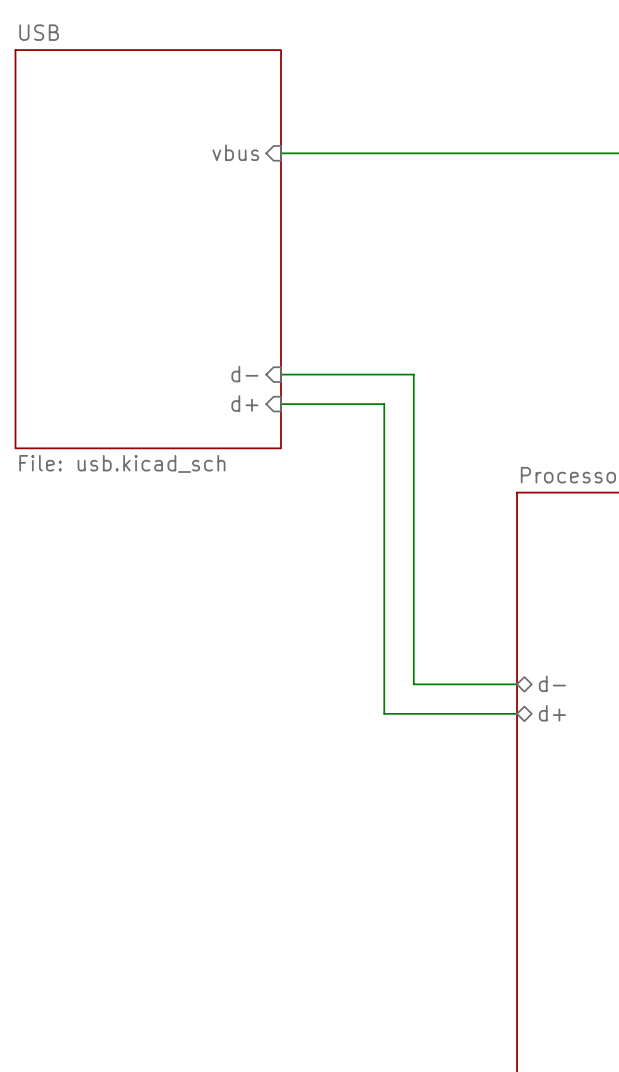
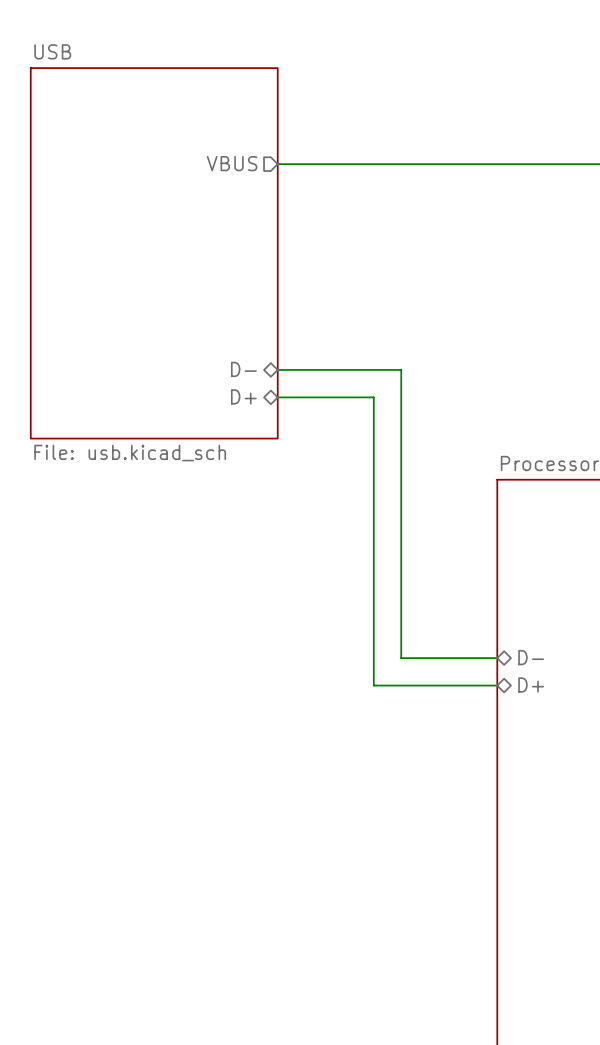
sheet pin shape: input (235, 152) -> output (232, 163)
sheet pin: vbus (235, 152) -> VBUS (232, 163)
sheet pin shape: input (244, 374) -> bidirectional (243, 369)
sheet pin: d- (244, 374) -> D- (243, 369)
sheet pin shape: input (244, 403) -> bidirectional (243, 396)
sheet pin: d+ (244, 403) -> D+ (243, 396)
sheet pin: d- (552, 683) -> D- (531, 657)
sheet pin: d+ (552, 713) -> D+ (531, 685)

